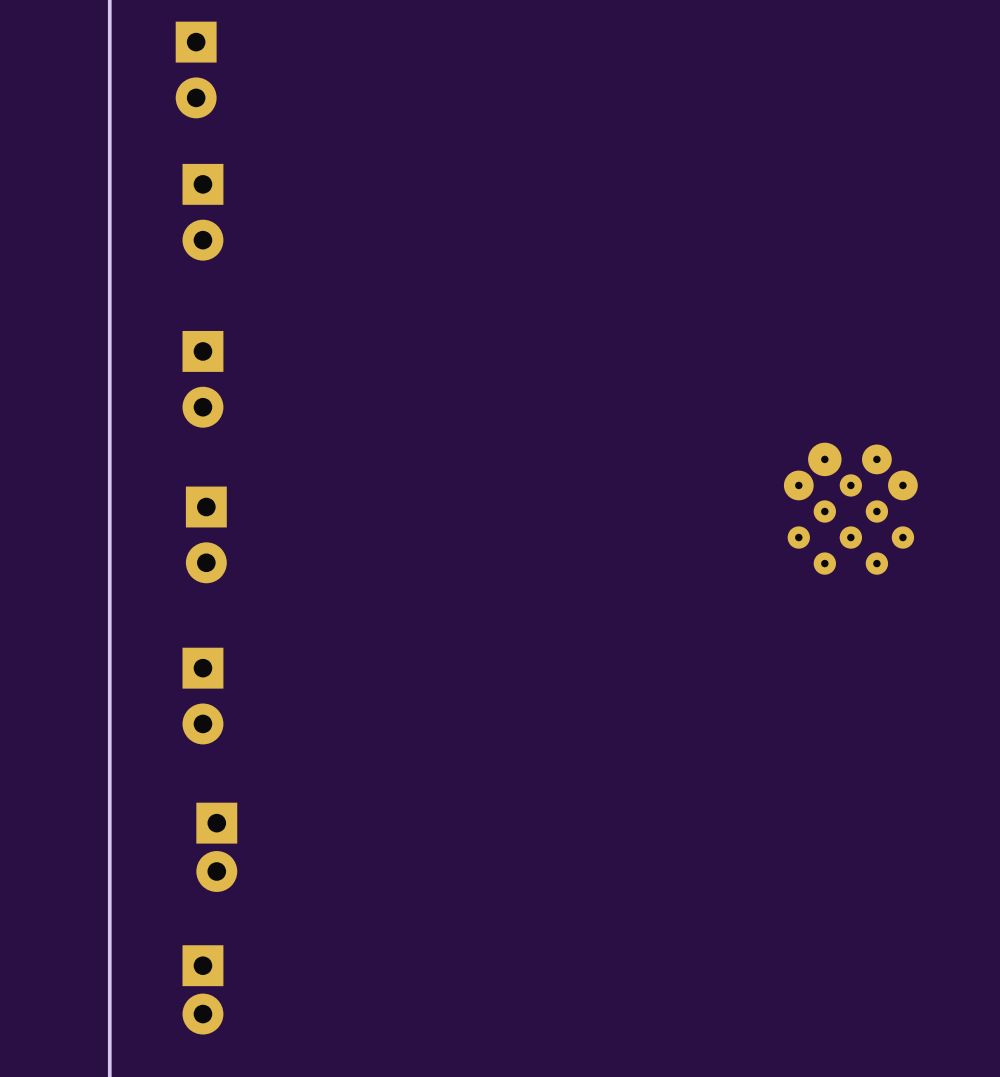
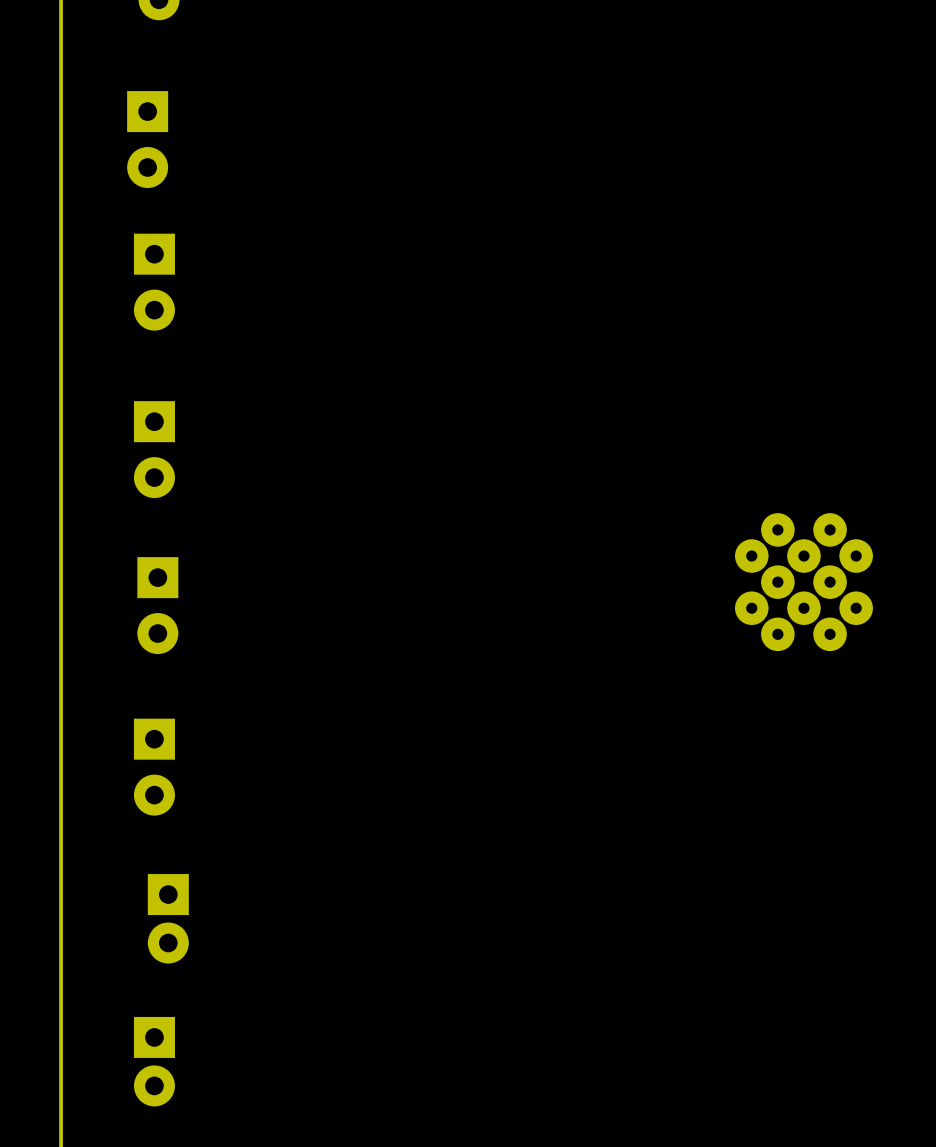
part footprint: [783, 442, 918, 575] -> [734, 513, 873, 652]

